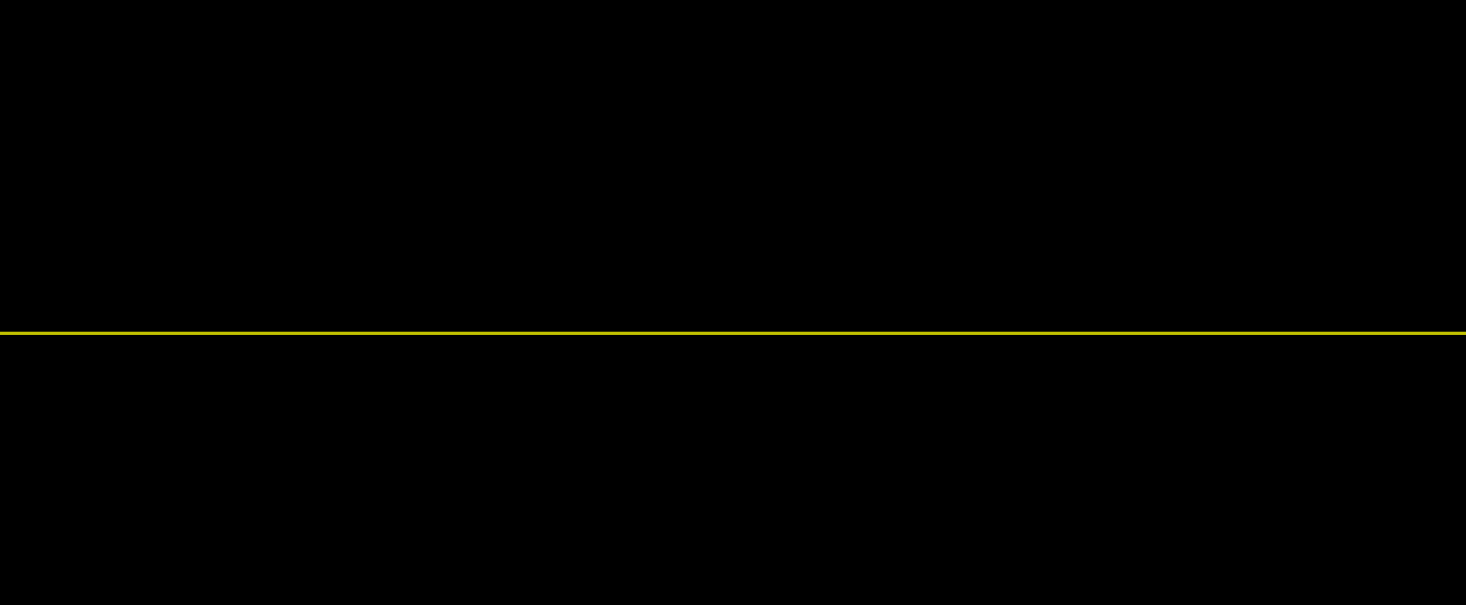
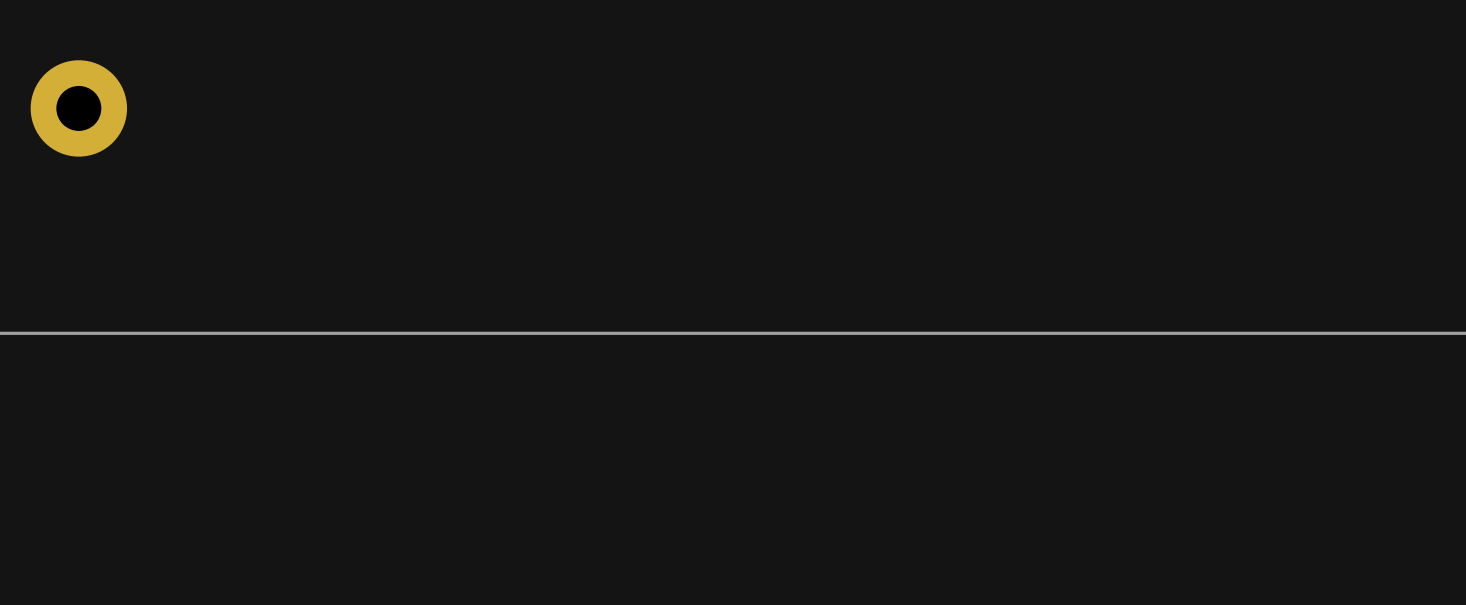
part: none -> (78, 108)

